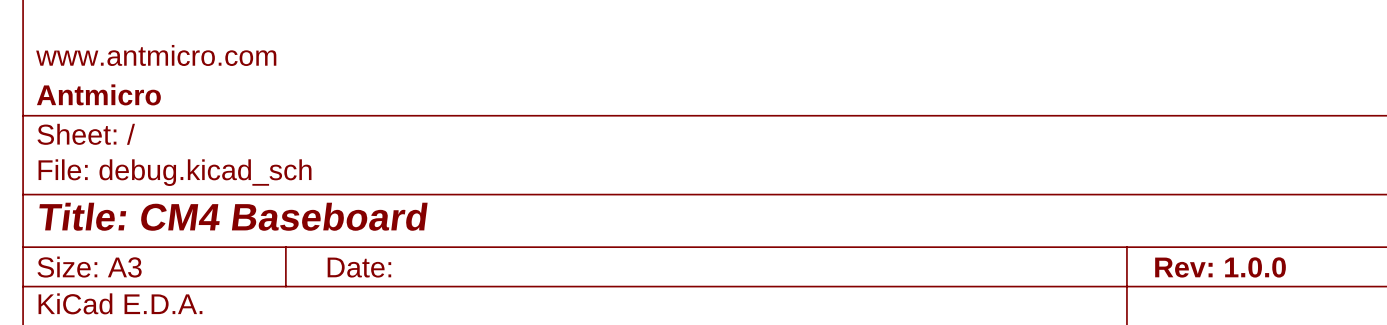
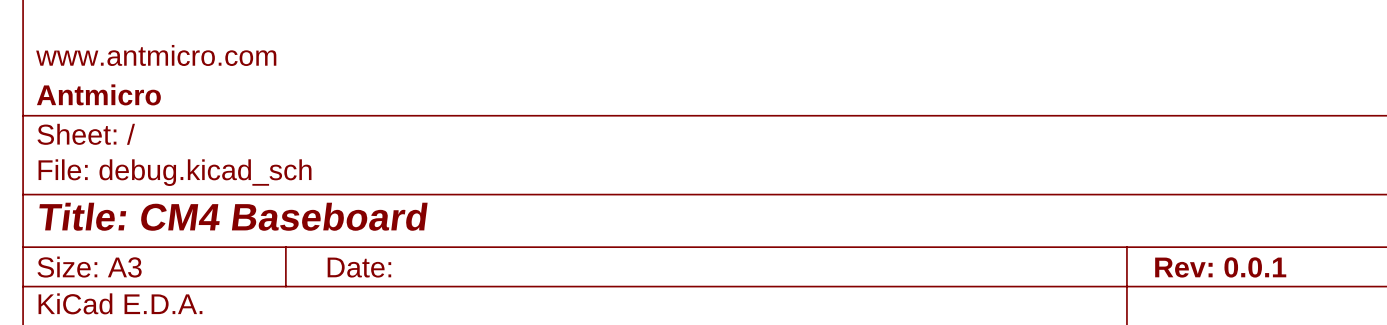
title block: Rev: 1.0.0 (1220, 267) -> Rev: 0.0.1 (1220, 267)

